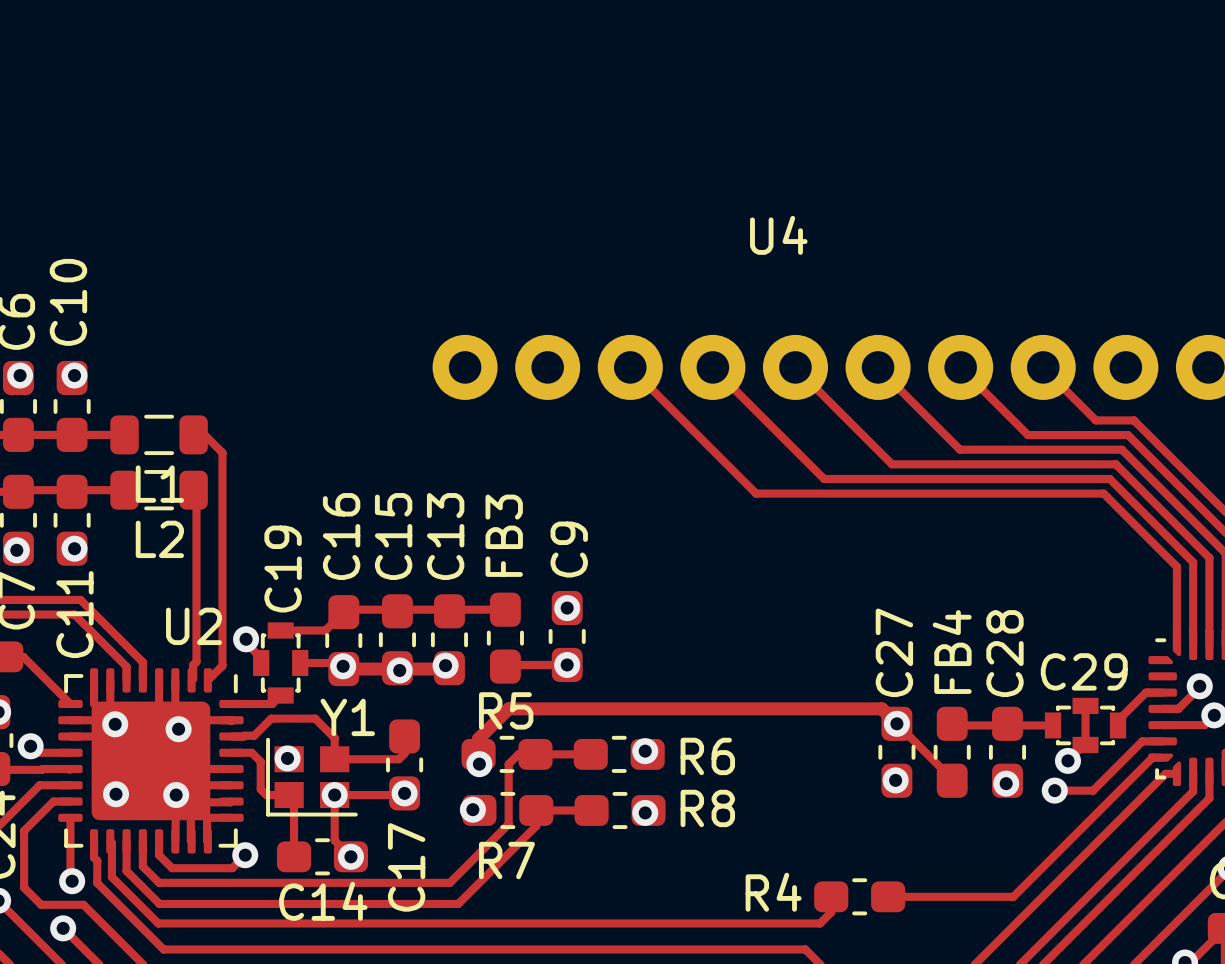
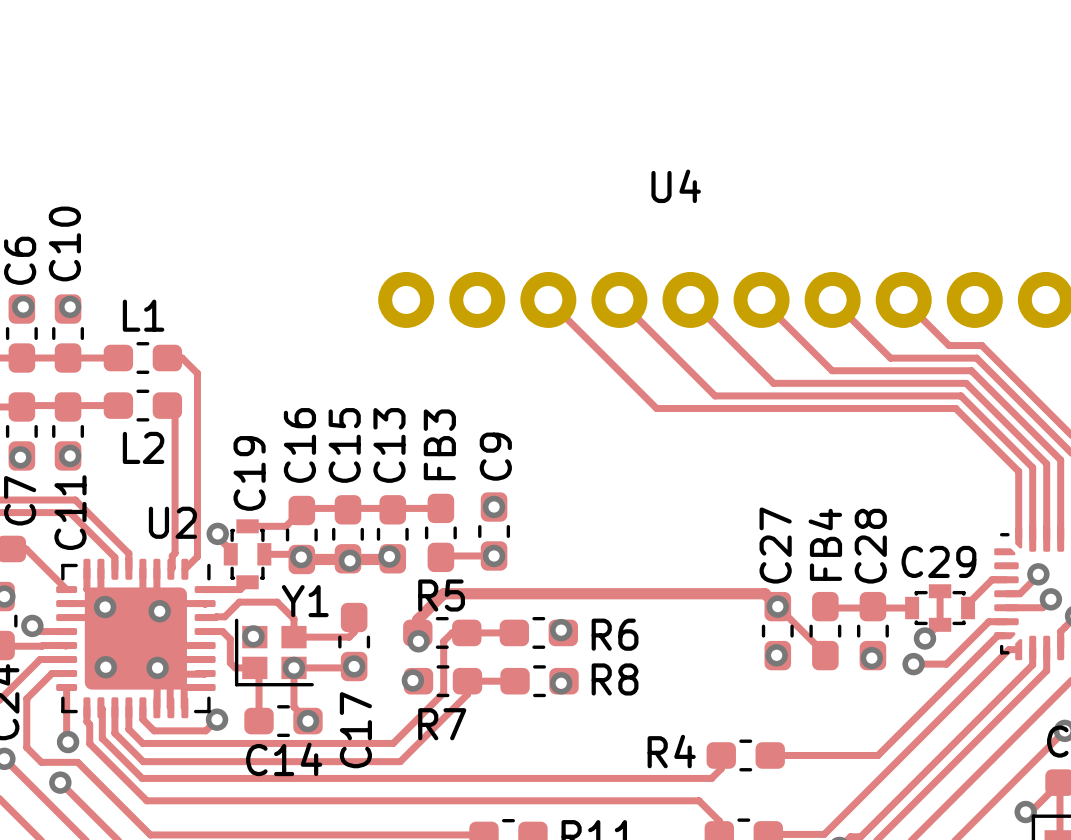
L1 footprint: [110, 414, 208, 456] -> [103, 342, 183, 374]
L2 footprint: [110, 470, 208, 511] -> [103, 389, 183, 422]
L1 name position: L1 (159, 484) -> L1 (143, 315)

